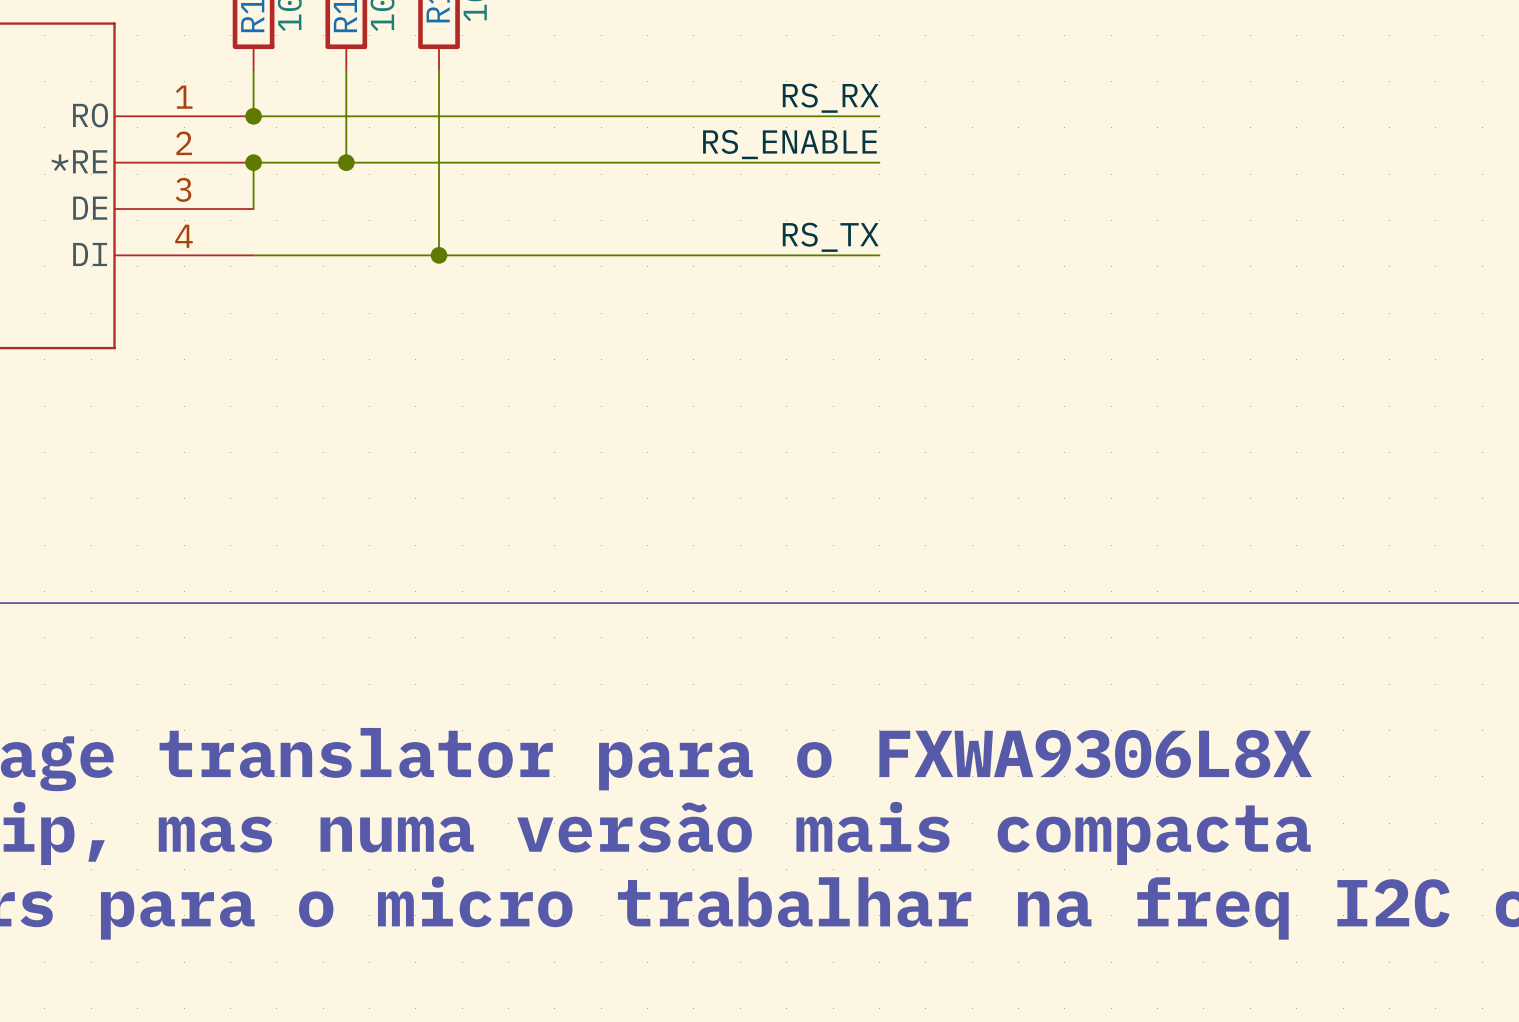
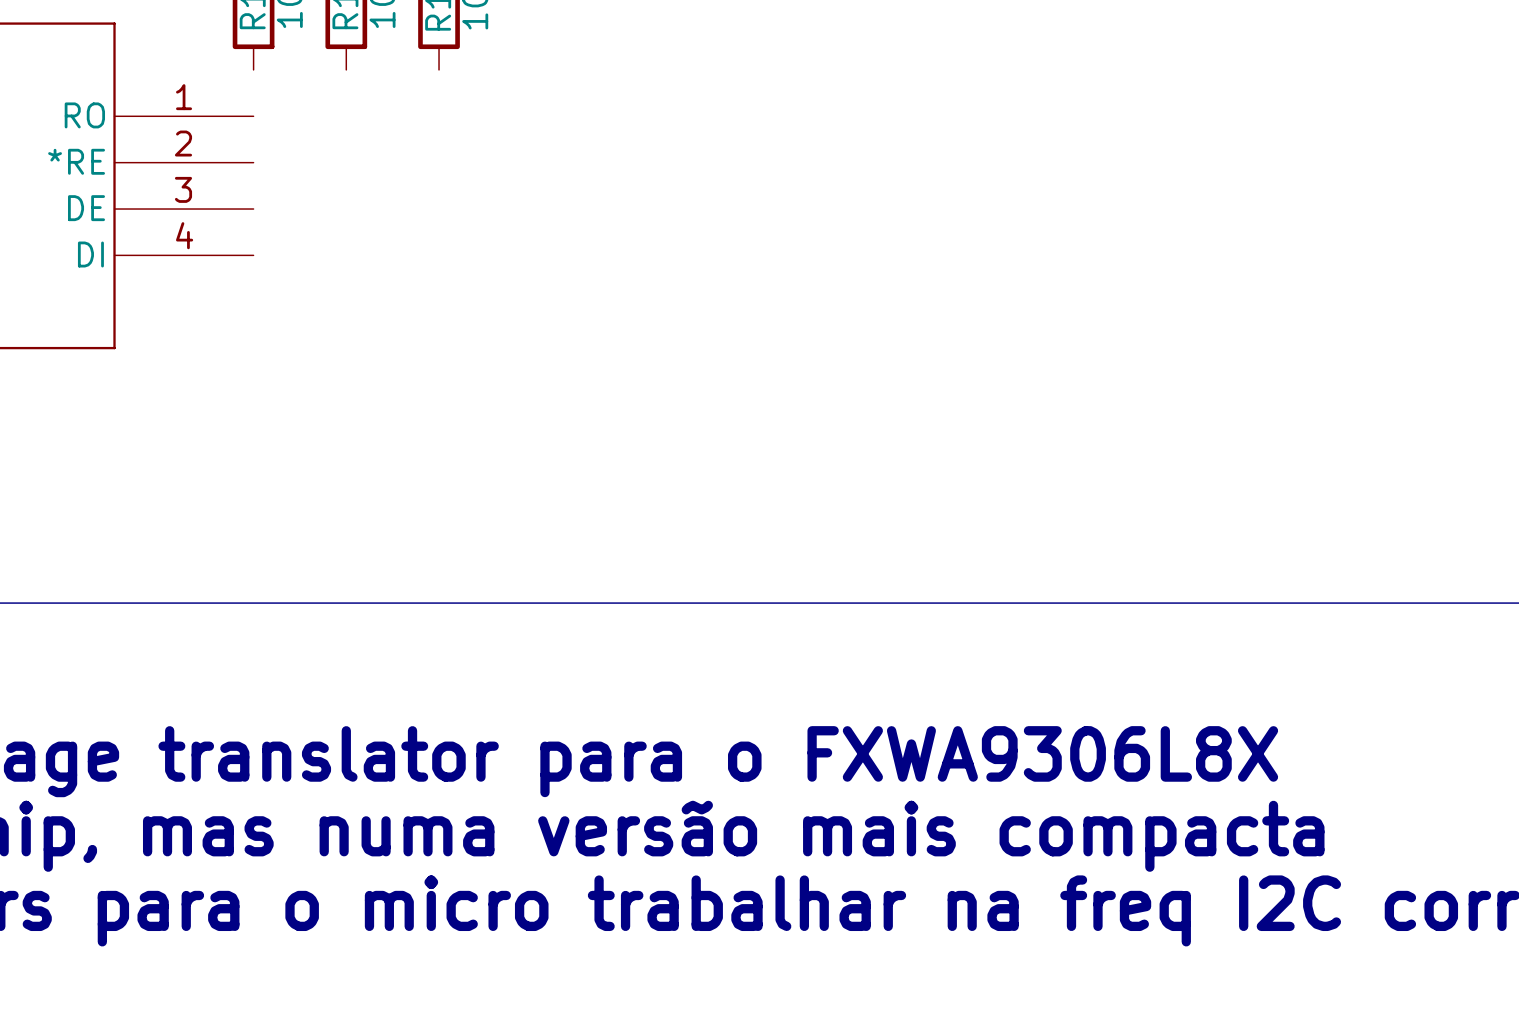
wire: (253, 69) (253, 116) (879, 116) -> none
wire: (346, 69) (346, 162) -> none
wire: (439, 69) (439, 255) -> none
label: RS_RX (830, 98) -> none
junction: (253, 116) -> none
label: RS_ENABLE (789, 144) -> none
junction: (253, 162) -> none
junction: (346, 162) -> none
wire: (879, 162) (253, 162) (253, 209) -> none
label: RS_TX (830, 237) -> none
wire: (253, 255) (879, 255) -> none
junction: (439, 255) -> none

